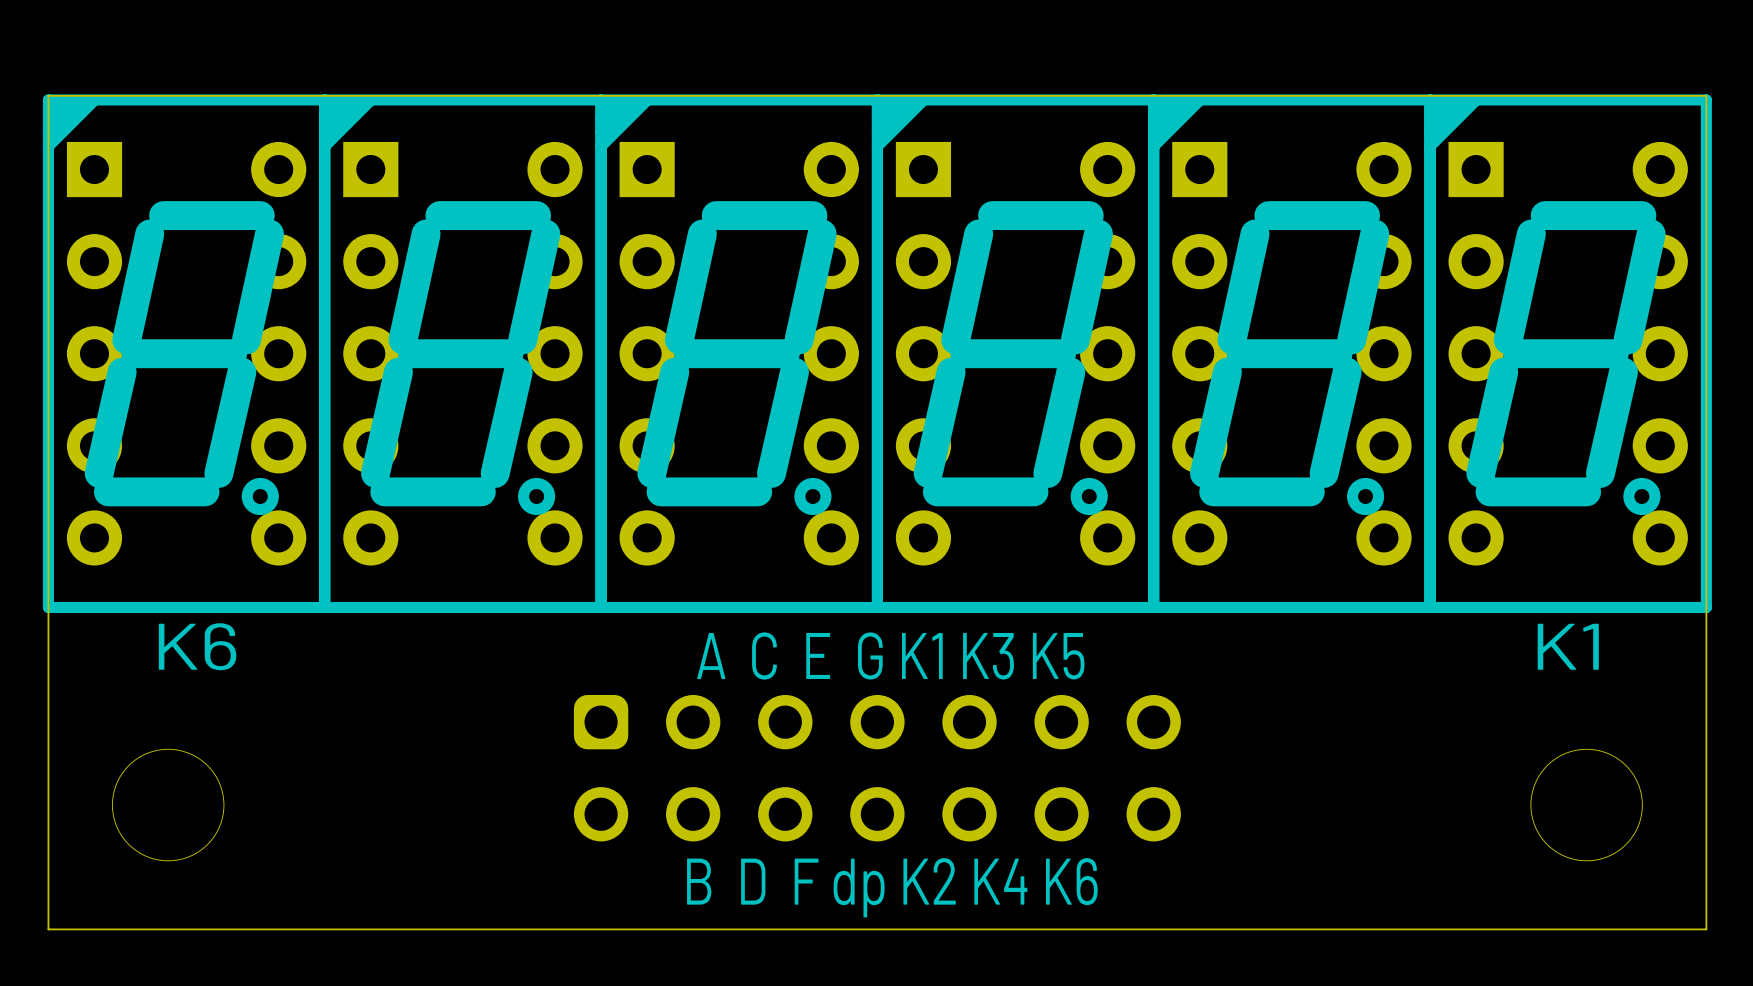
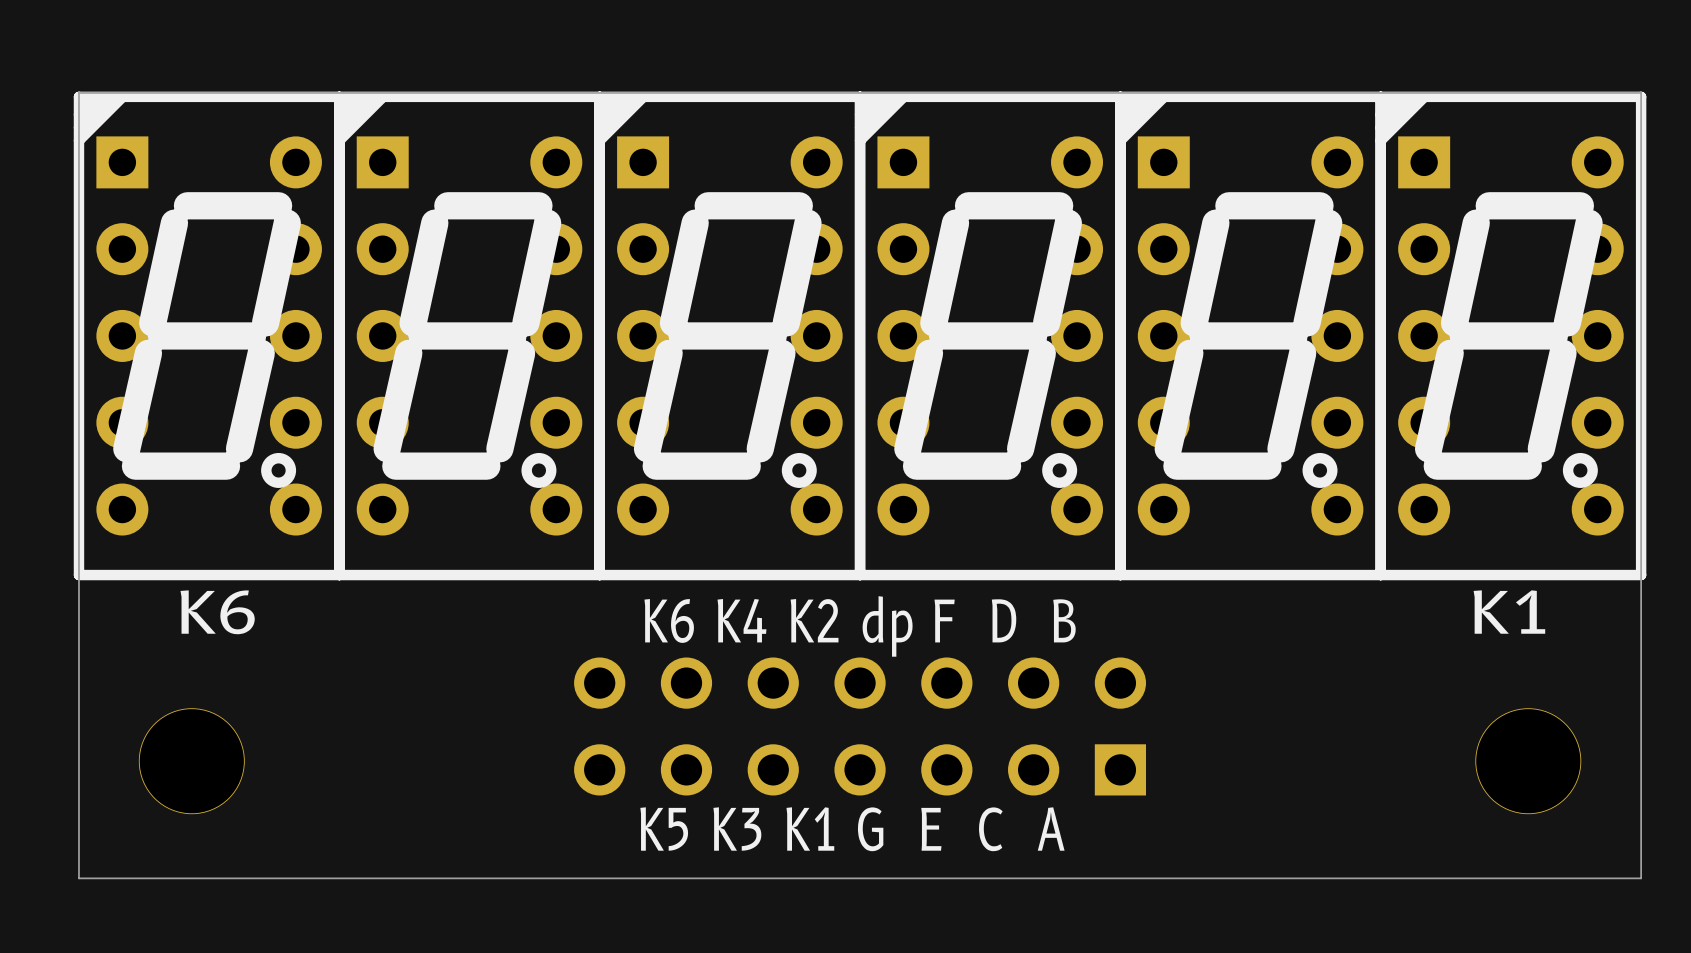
text: A C E G K1 K3 K5 (890, 656) -> K6 K4 K2 dp F D B (860, 626)
part footprint: [573, 694, 1181, 842] -> [574, 657, 1147, 796]
text: B D F dp K2 K4 K6 (892, 887) -> K5 K3 K1 G E C A (852, 829)

